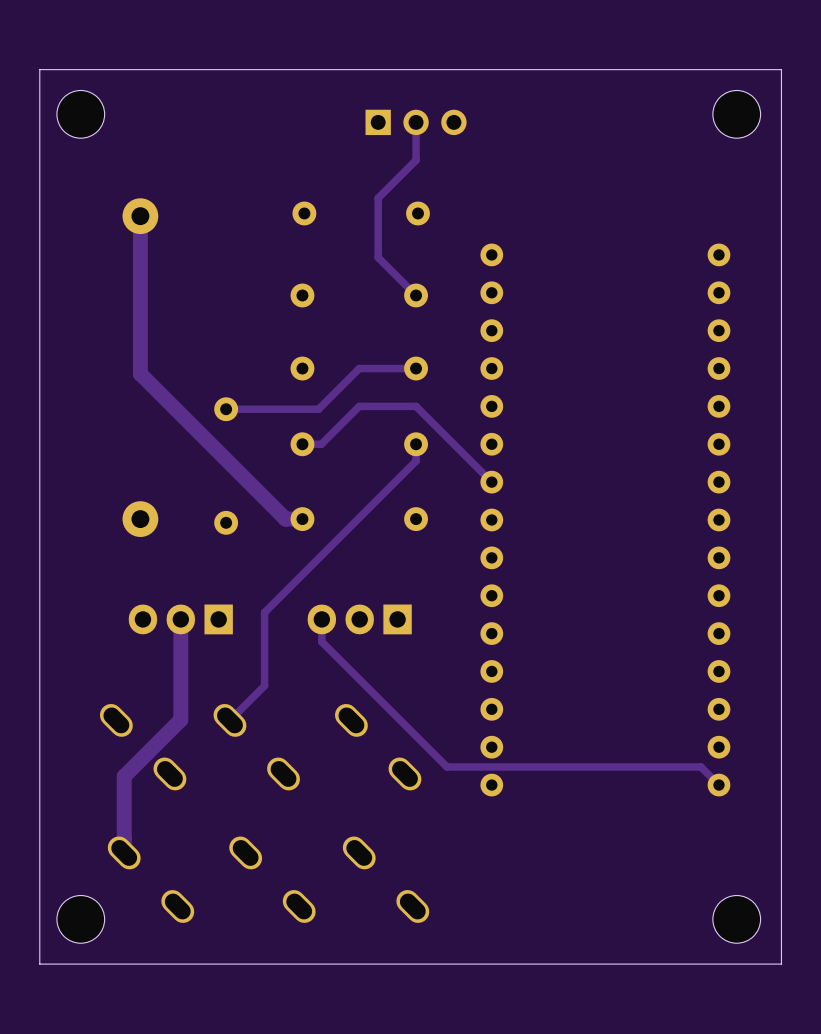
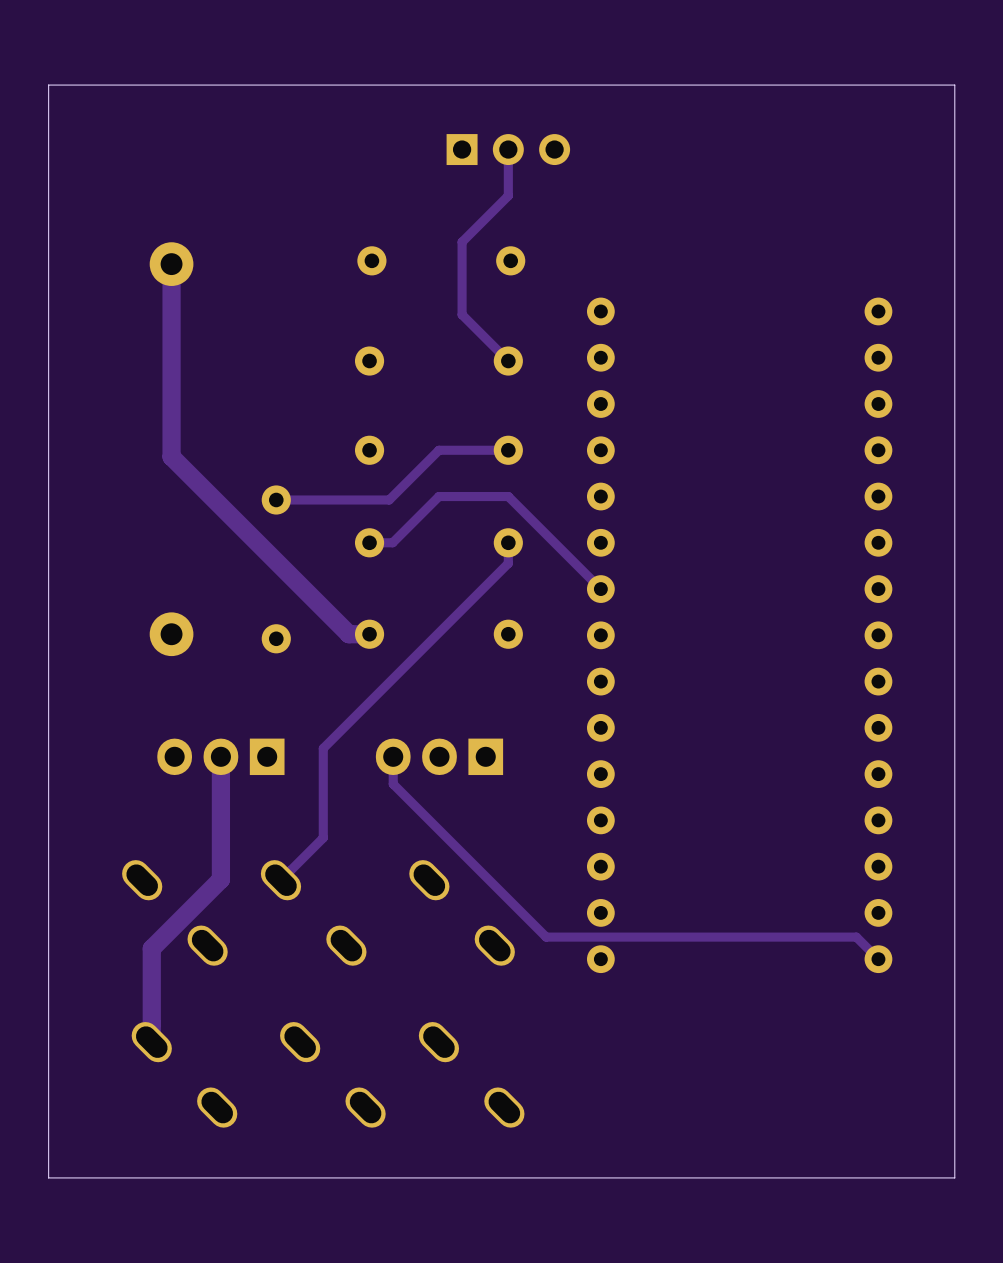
part: (80, 114) -> none
part: (736, 114) -> none
part: (80, 919) -> none
part: (736, 919) -> none

